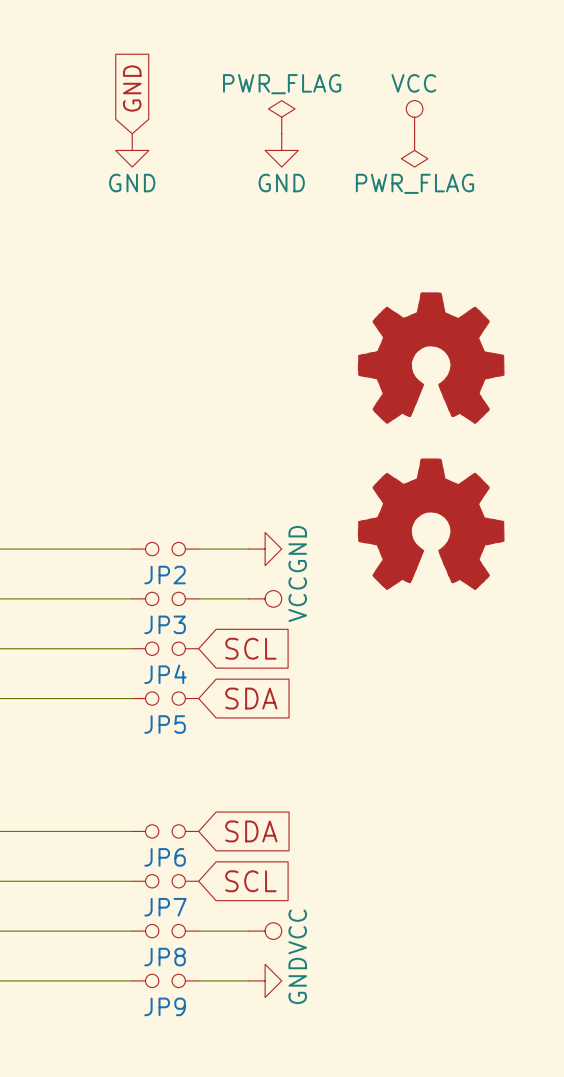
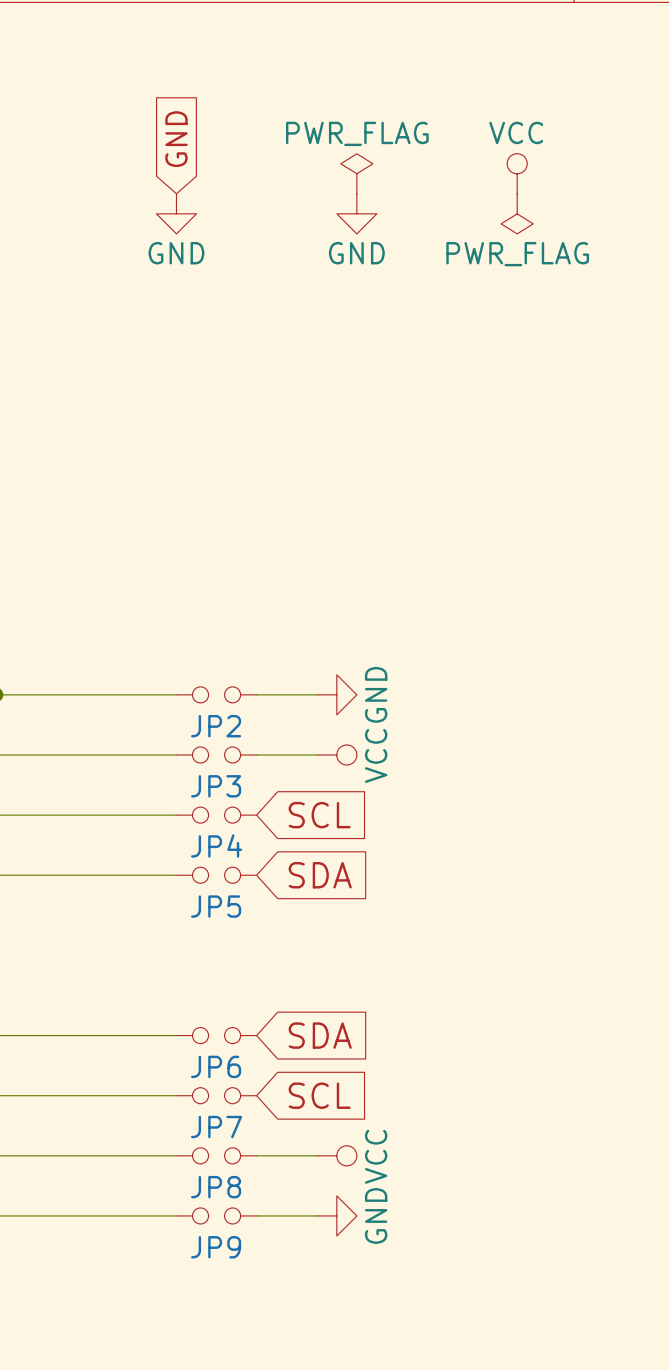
part: (431, 358) -> none
part: (431, 524) -> none

